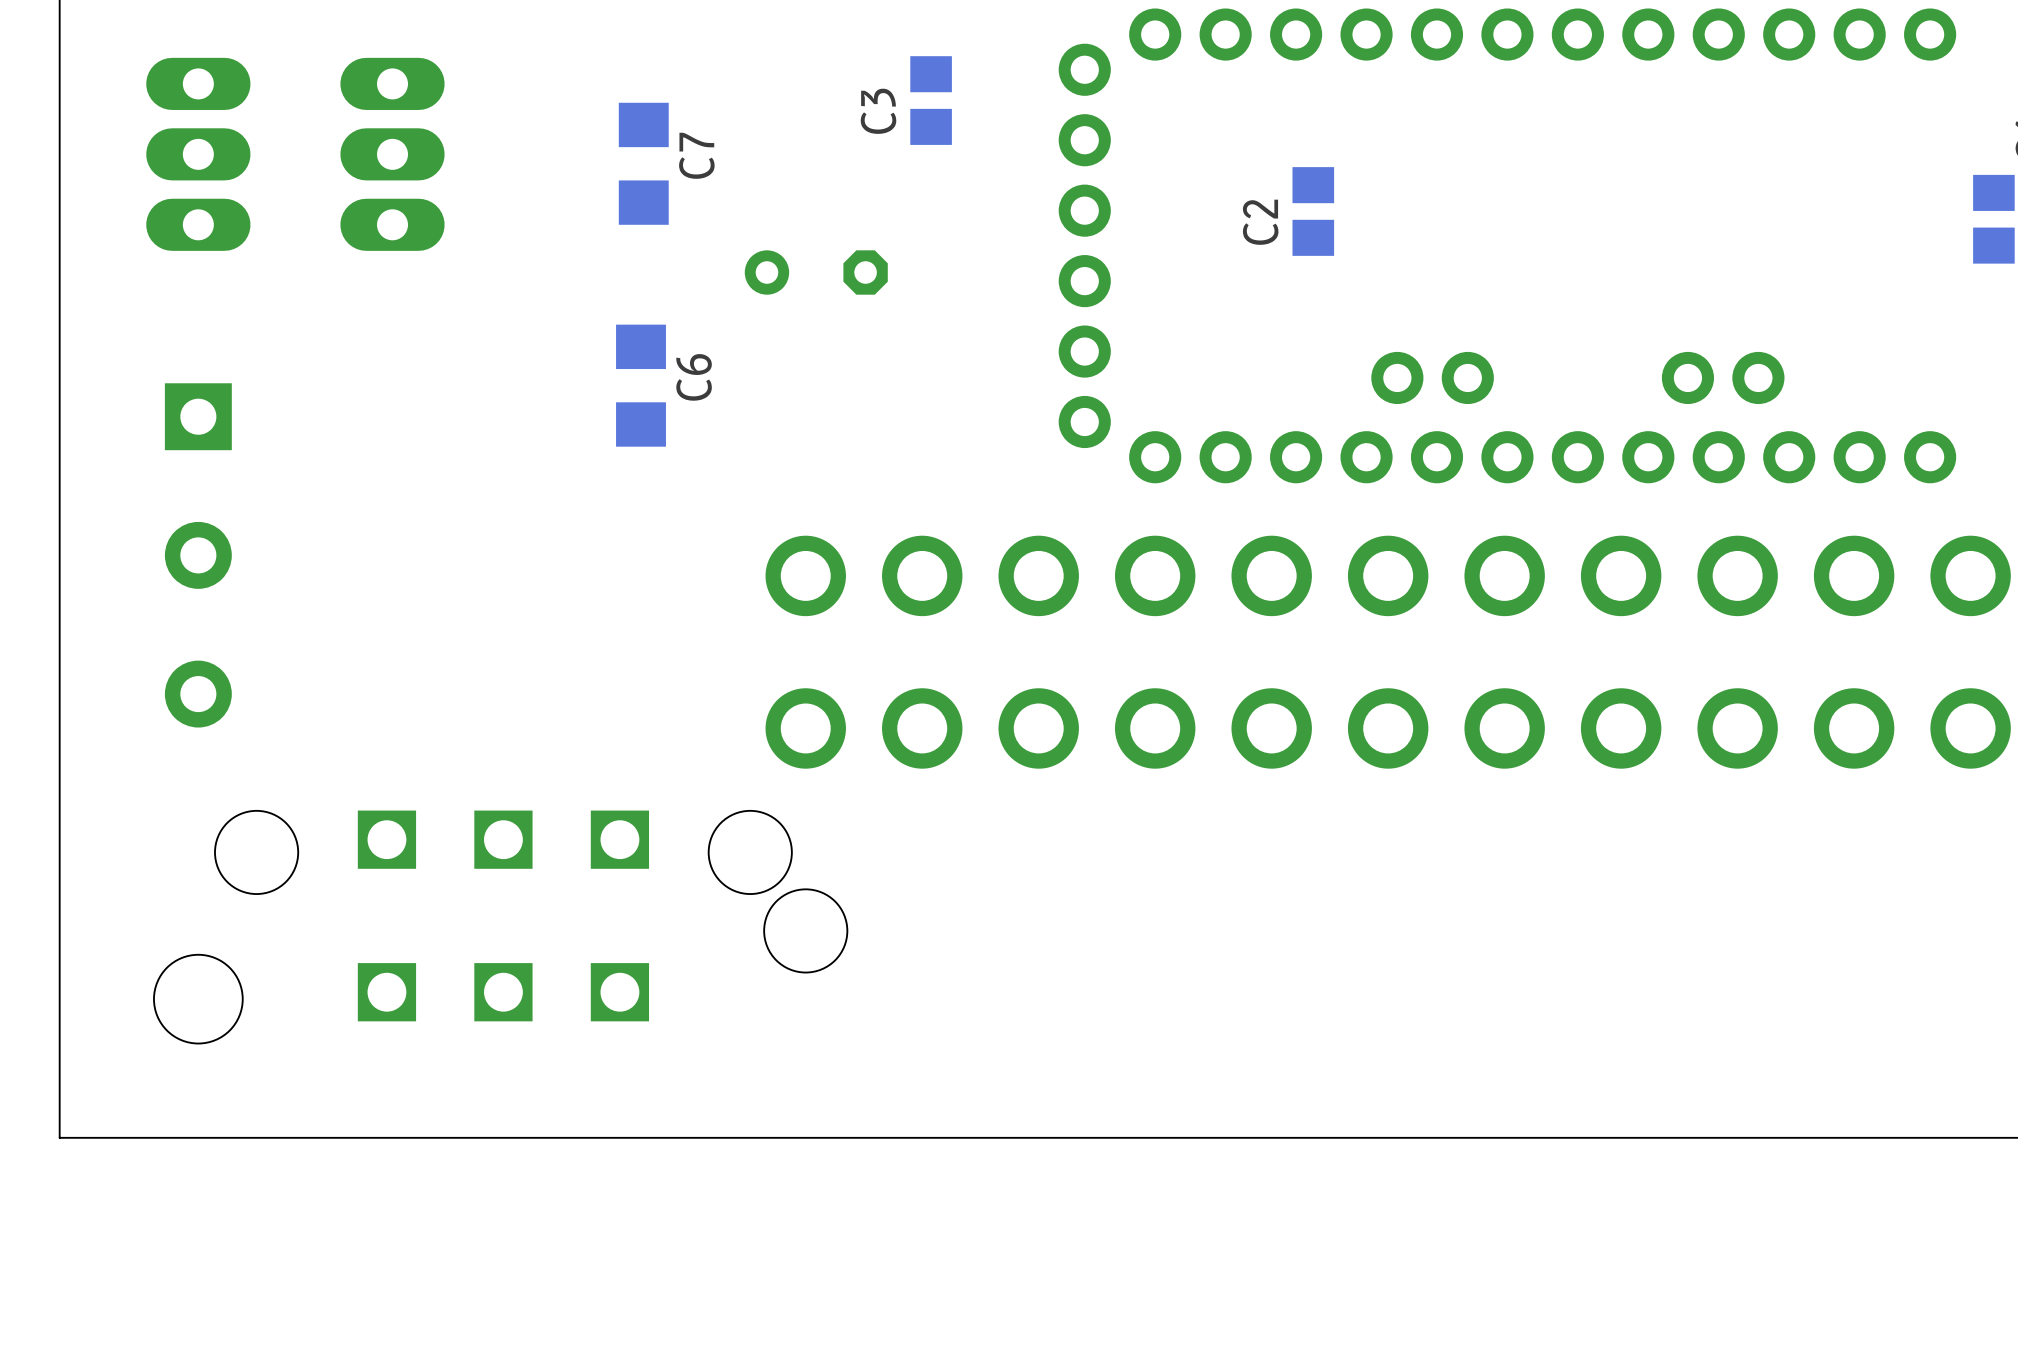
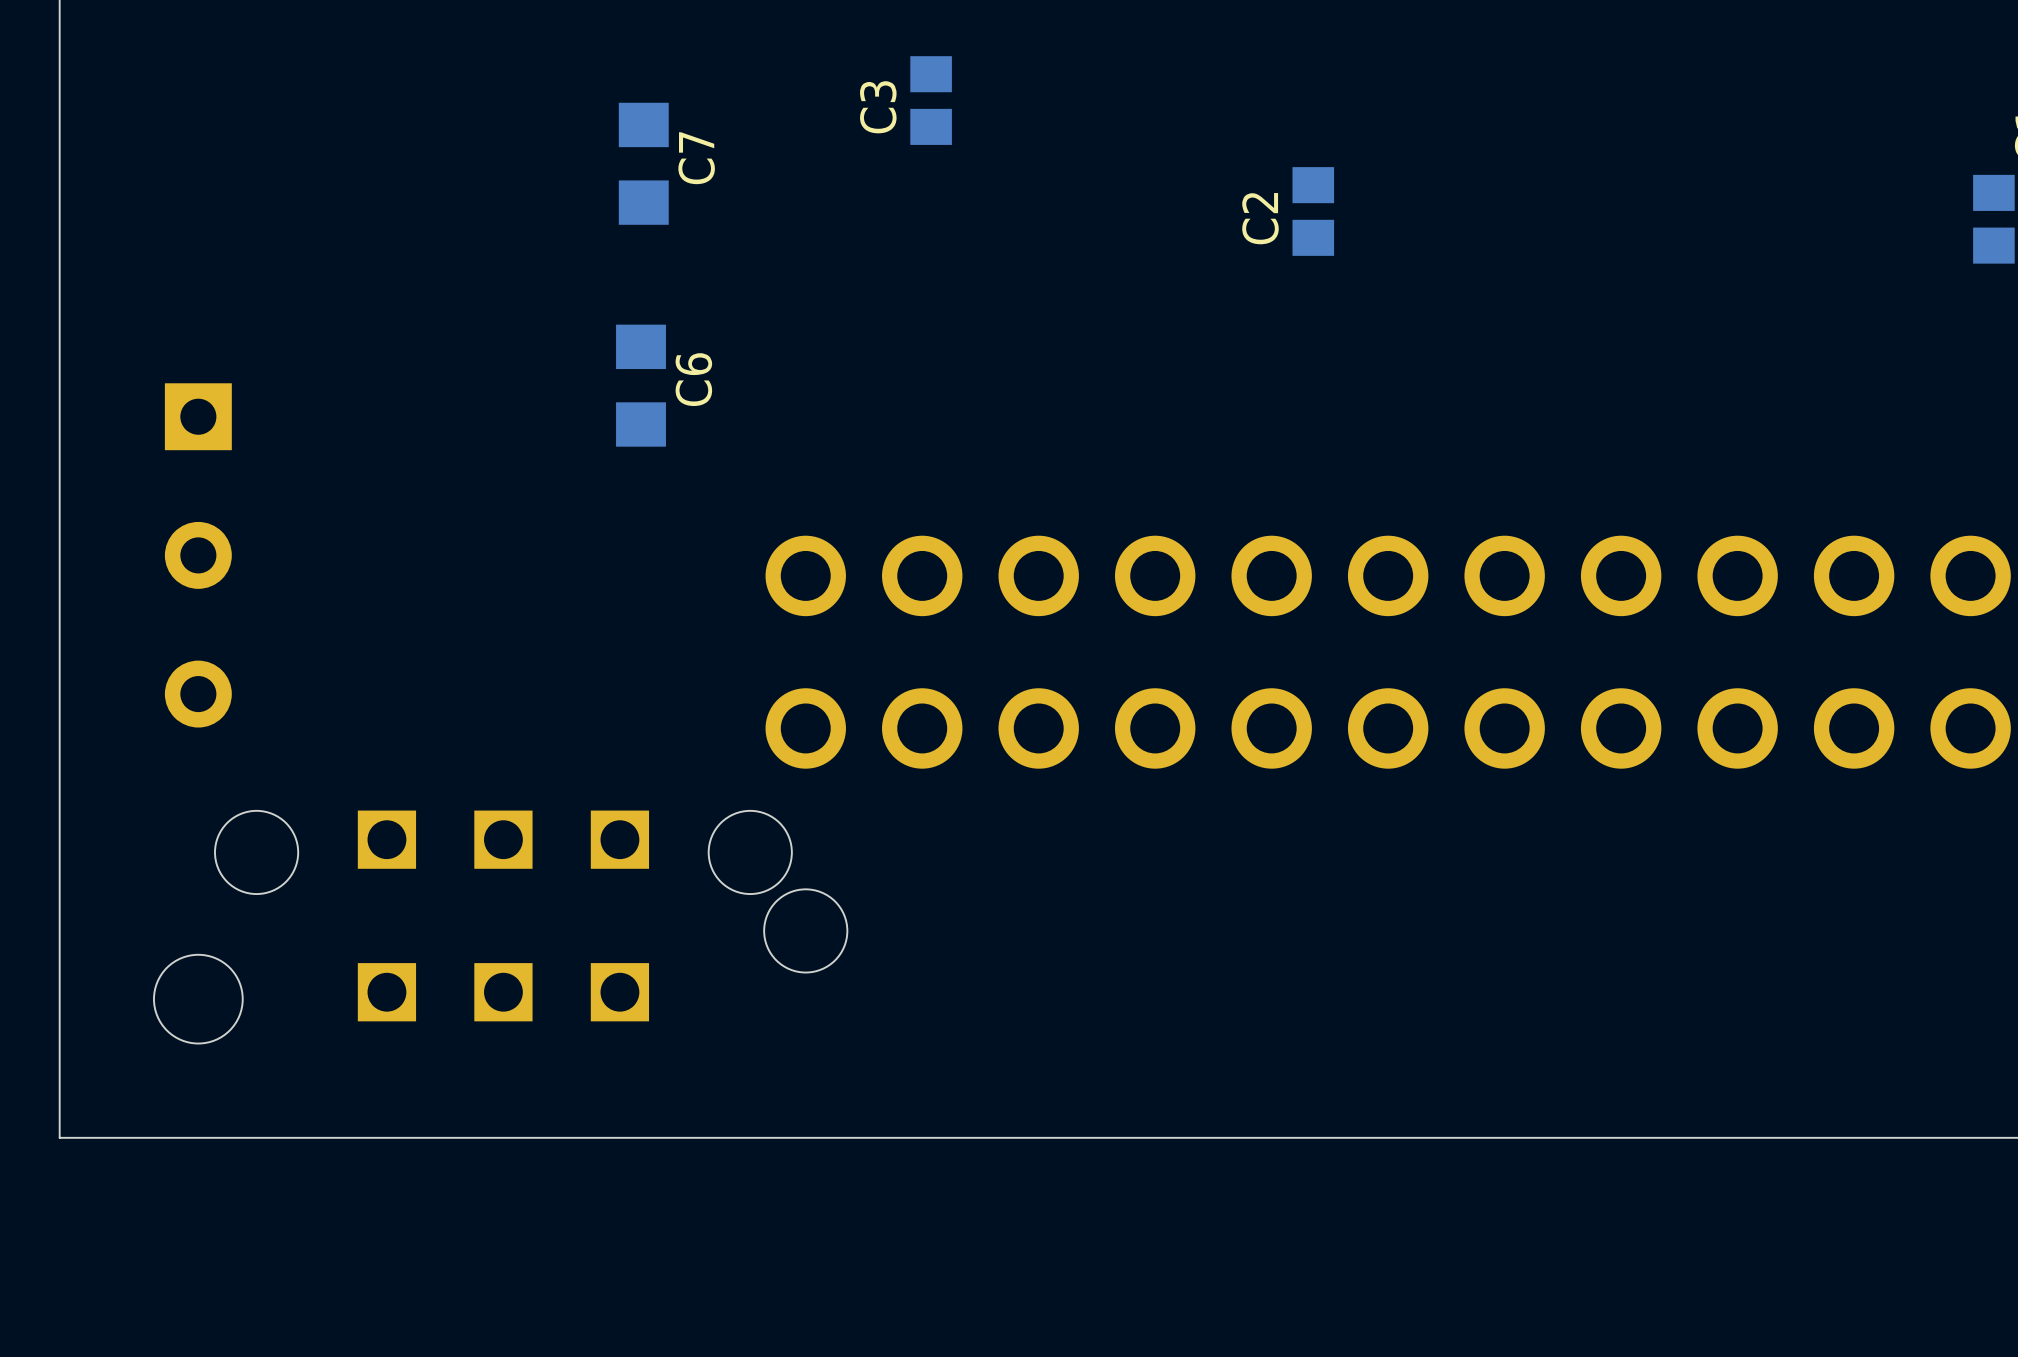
part: (198, 154) -> none
part: (392, 154) -> none
part: (1507, 245) -> none
part: (816, 272) -> none

